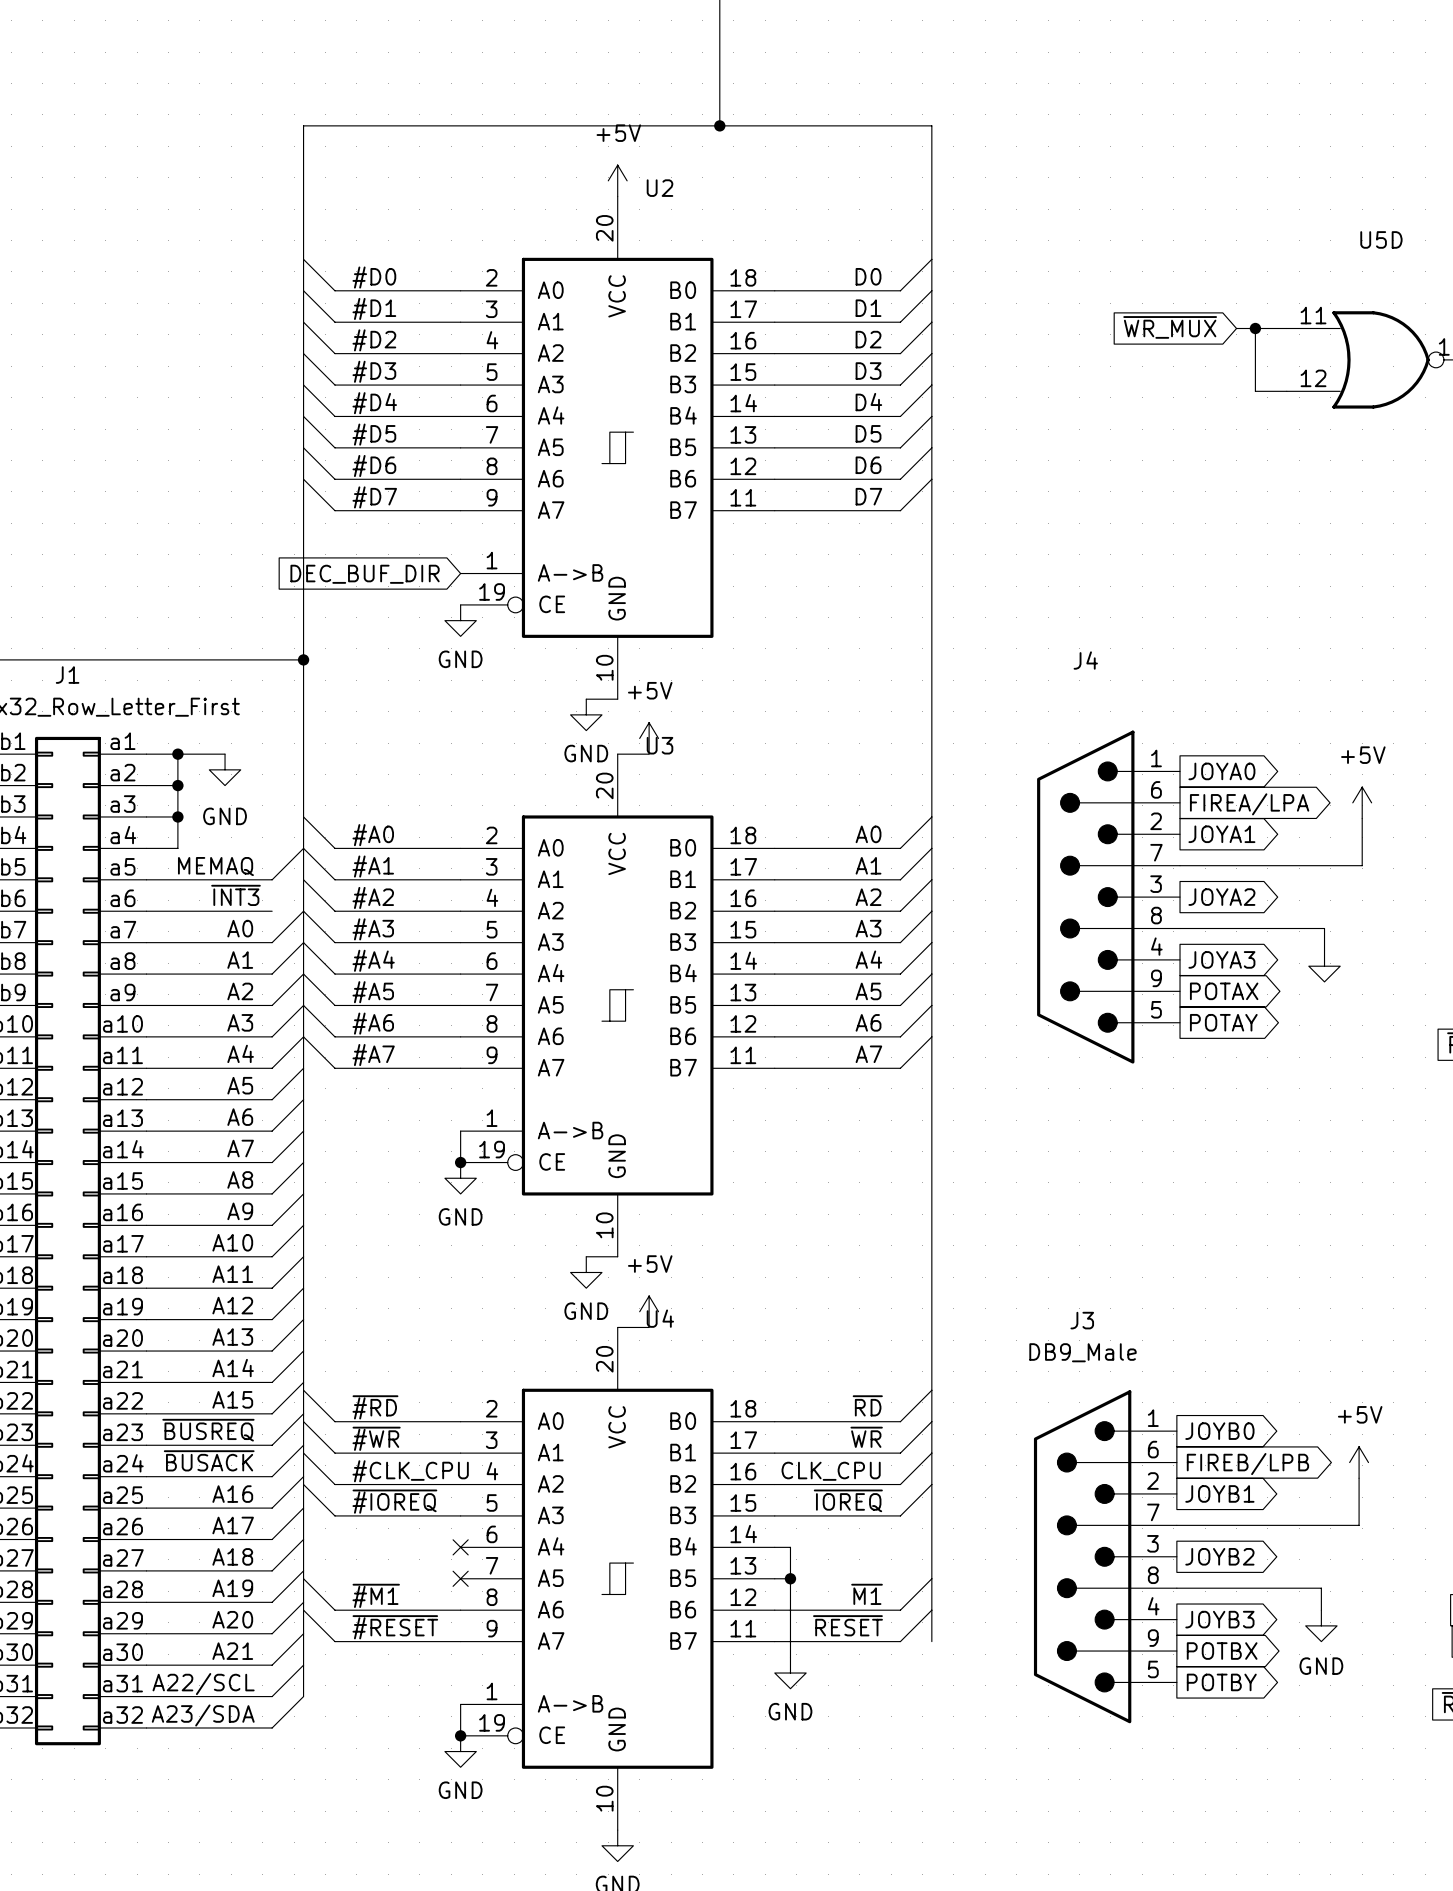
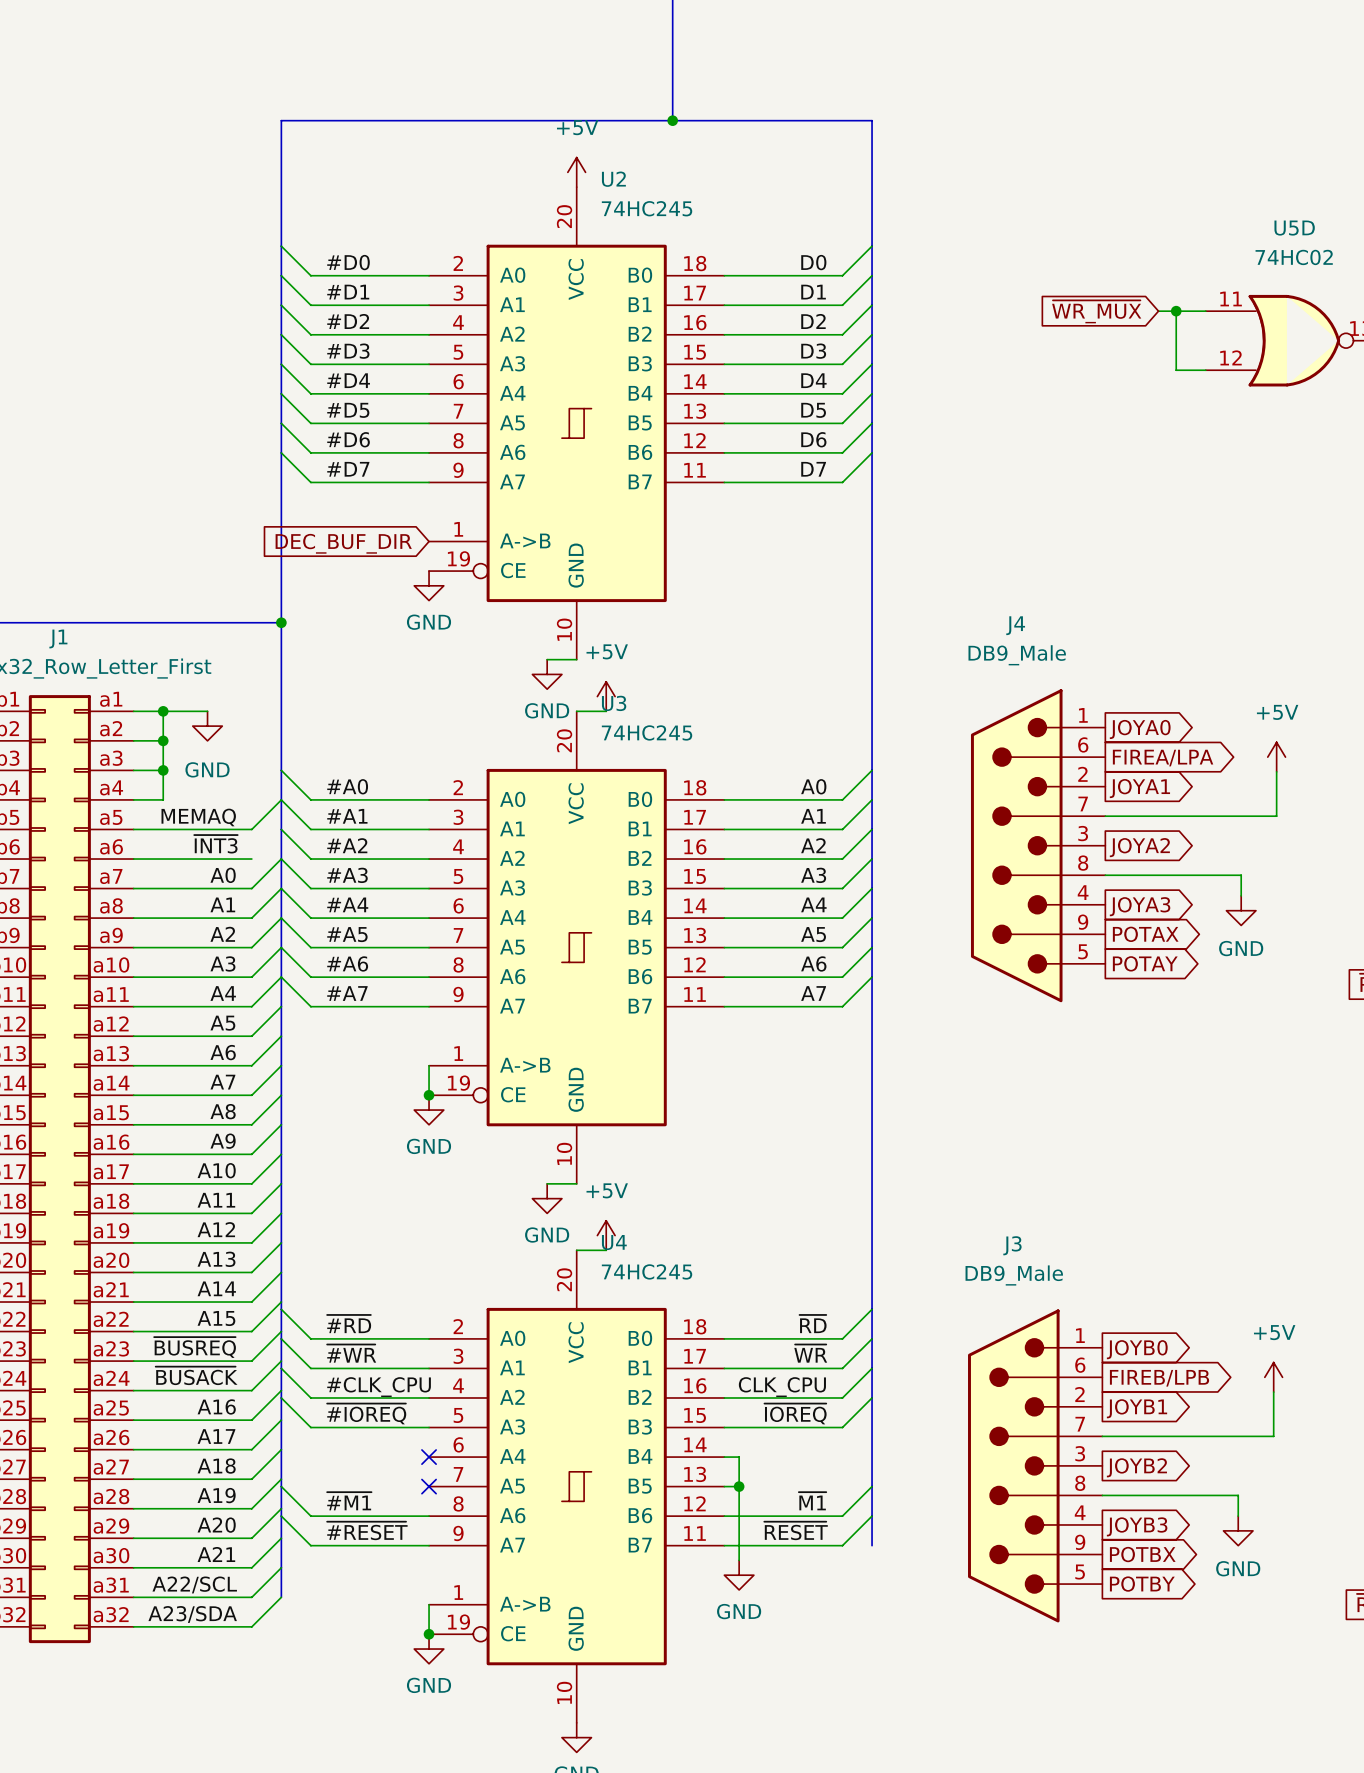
U2 value: none -> 74HC245 (647, 208)
U5D value: none -> 74HC02 (1294, 257)
J4 value: none -> DB9_Male (1017, 655)
U3 value: none -> 74HC245 (647, 732)
power symbol text: none -> GND (1241, 948)
U4 value: none -> 74HC245 (647, 1271)

